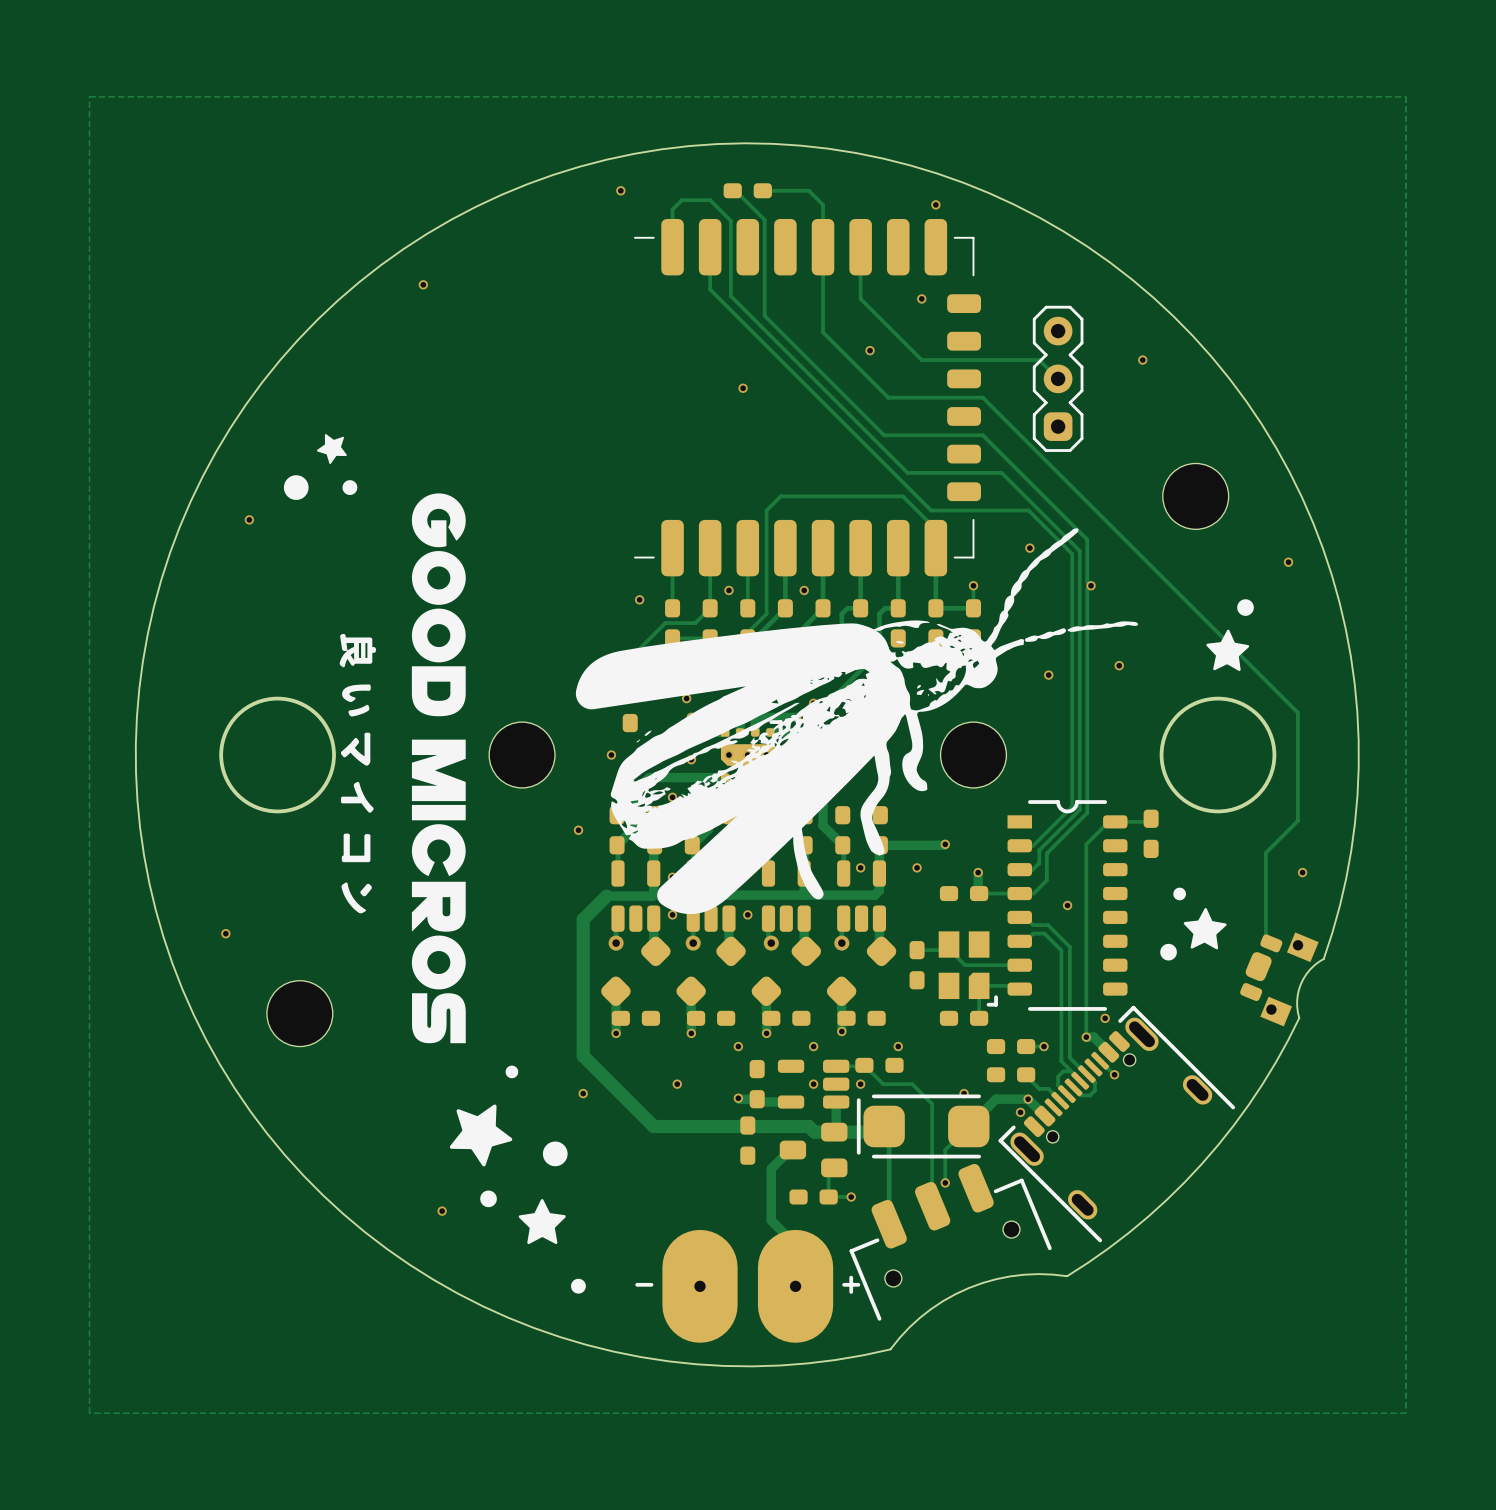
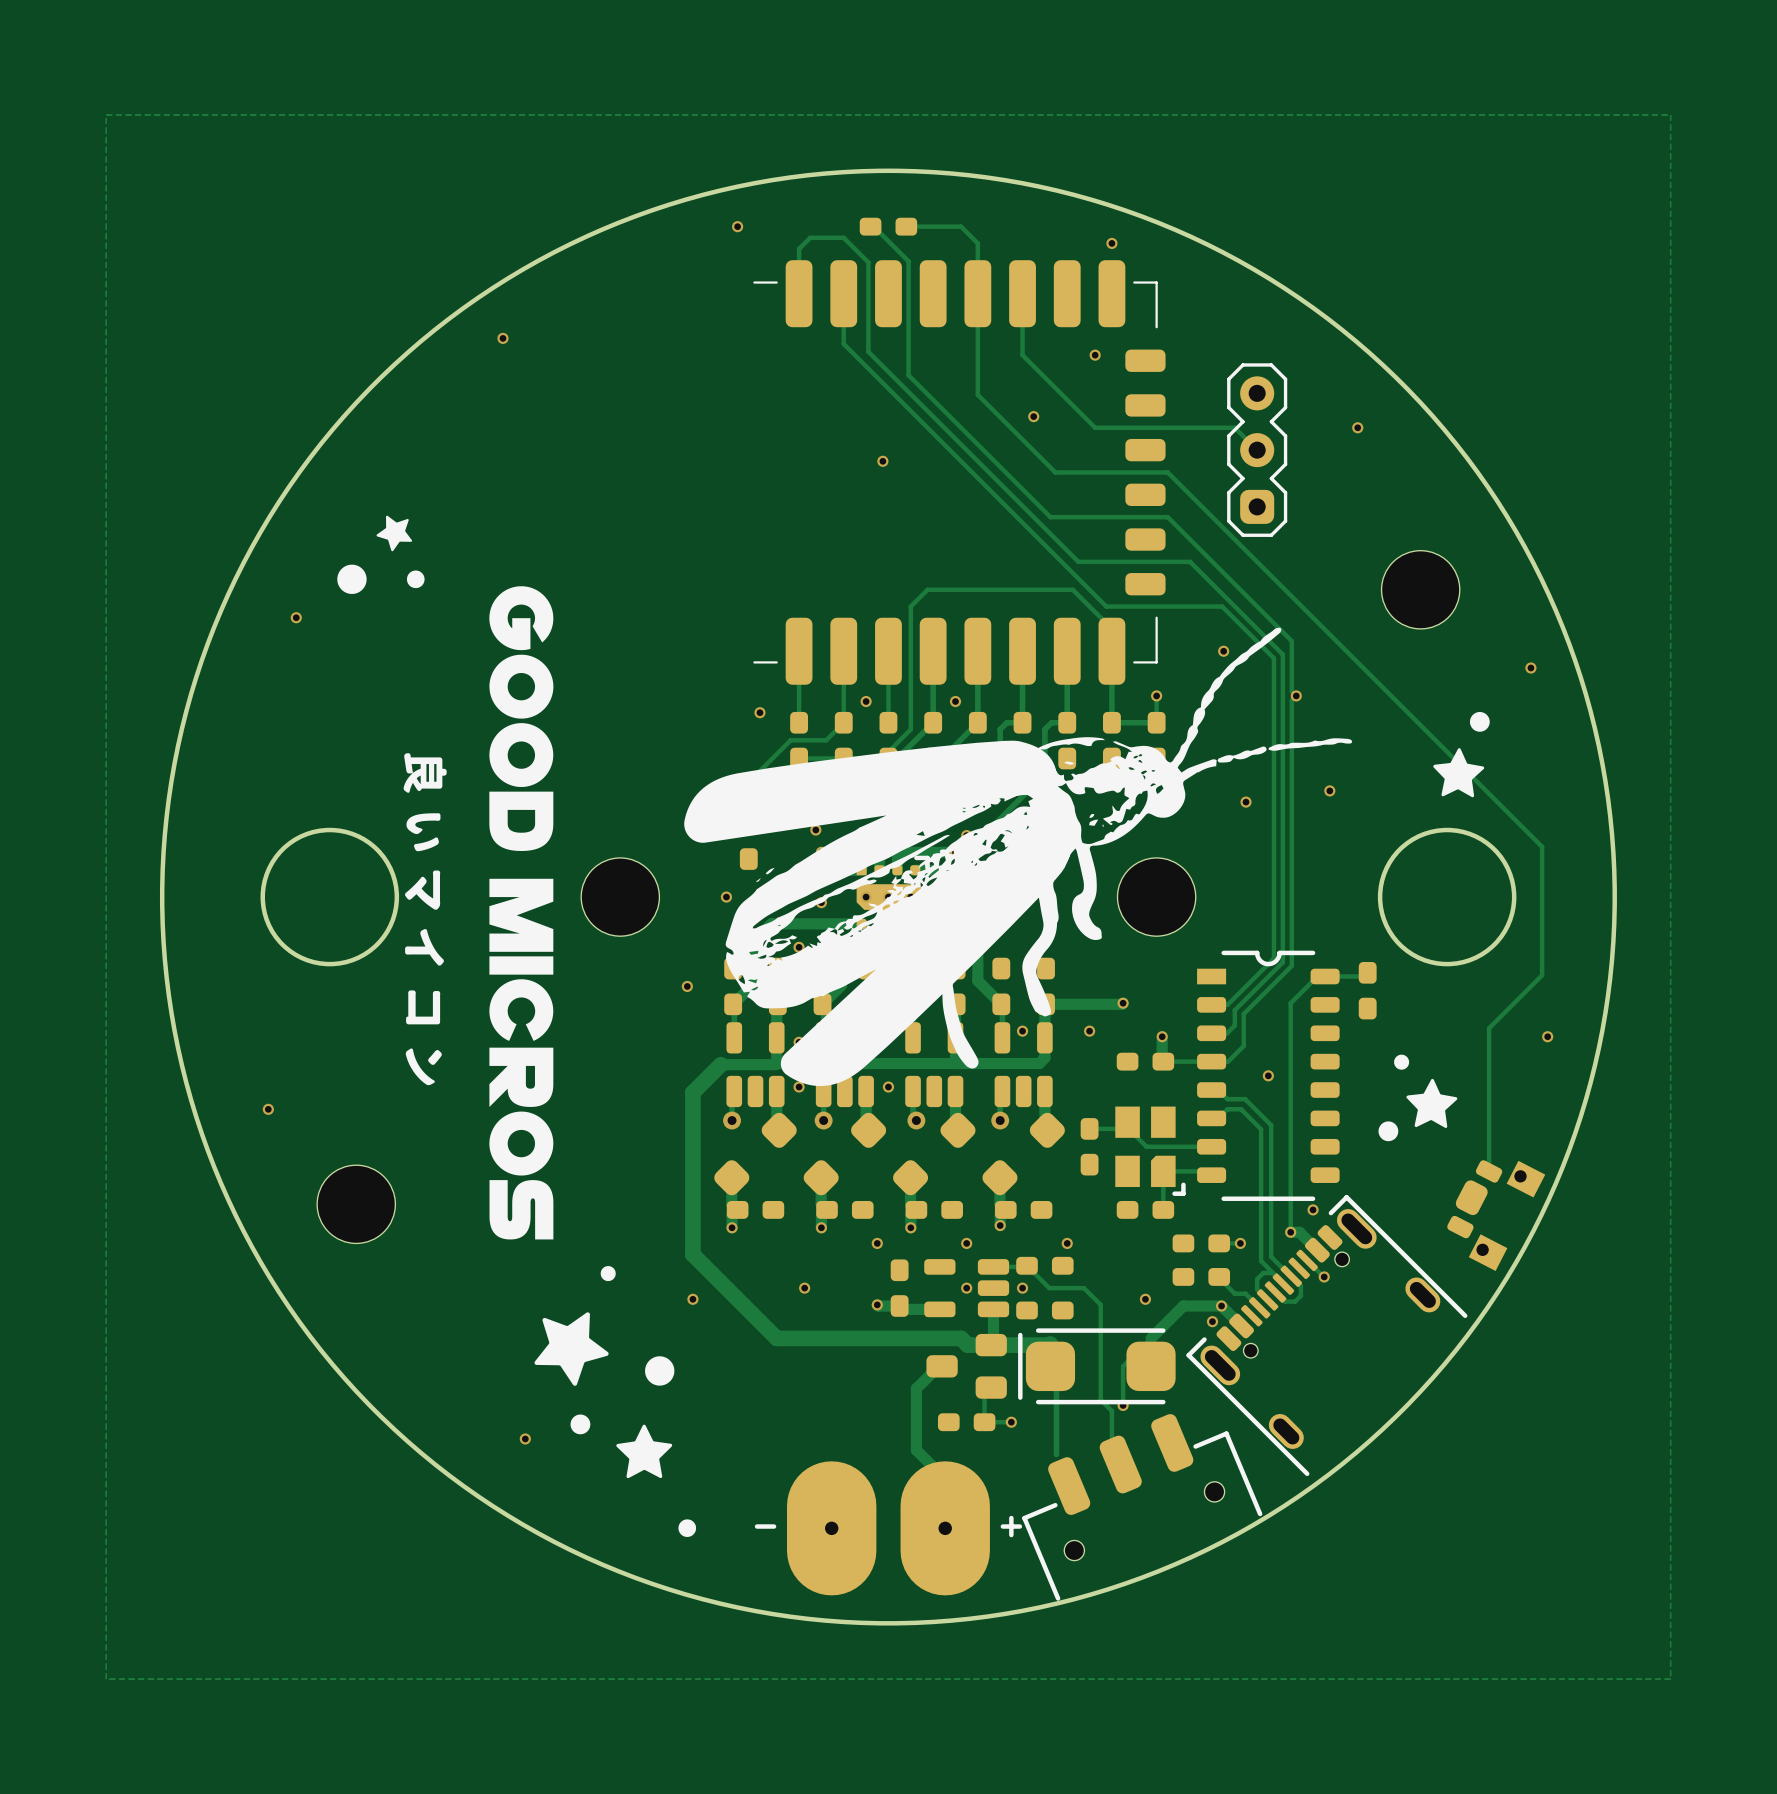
round board edge: none -> [159, 168, 1617, 1626]
track: (1265, 852) (1265, 937) (1271, 943) -> (1504, 1013) (1489, 1028) (1489, 1171)
board edge: (1323, 958) (1346, 878) (1354, 823) (1358, 767) (1357, 712) (1350, 656) (1339, 602) (1323, 548) (1301, 497) (1276, 447) (1246, 400) (1211, 356) (1173, 316) (1131, 279) (1086, 246) (1014, 204) (963, 182) (910, 165) (828, 148) (772, 143) (717, 144) (661, 149) (606, 159) (553, 174) (501, 195) (451, 219) (380, 265) (337, 300) (298, 339) (245, 404) (216, 451) (190, 501) (169, 553) (153, 606) (142, 661) (136, 716) (136, 772) (140, 828) (149, 883) (172, 963) (193, 1014) (219, 1064) (250, 1111) (284, 1154) (343, 1214) (387, 1249) (433, 1279) (482, 1306) (533, 1327) (586, 1345) (668, 1361) (724, 1365) (808, 1363) (890, 1349) (909, 1327) (931, 1309) (955, 1294) (982, 1283) (1024, 1274) (1067, 1276) (1108, 1248) (1148, 1216) (1184, 1182) (1218, 1144) (1248, 1104) (1275, 1062) (1299, 1018) (1297, 1000) (1300, 984) (1310, 969) (1323, 958) -> none
part: (1279, 979) -> none
part: none -> (1496, 1215)
track: (926, 1098) (932, 1103) (932, 1206) -> (1100, 1304) (1100, 1399) (1111, 1411) (1111, 1455) (1120, 1464)
part position: (923, 1126) -> (1096, 1366)
part rotation: 0° (747, 1140) -> 90° clockwise (1044, 1310)
part position: (747, 1140) -> (1044, 1310)
part: (950, 1242) -> none
part: none -> (1142, 1507)

